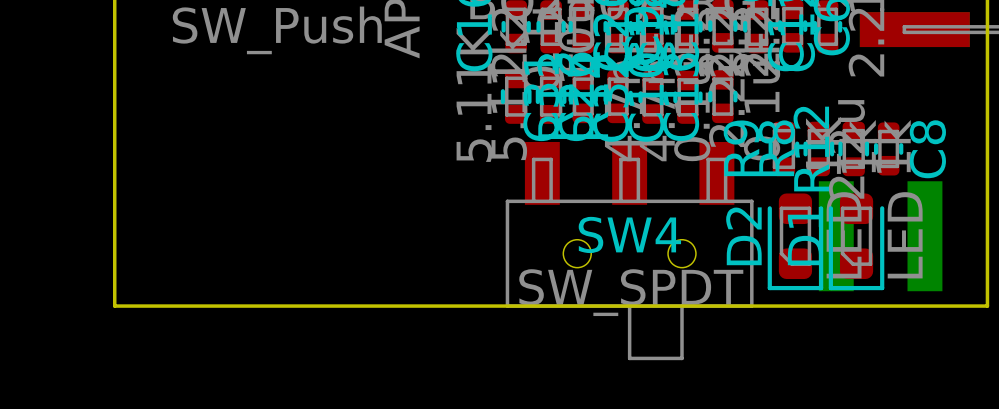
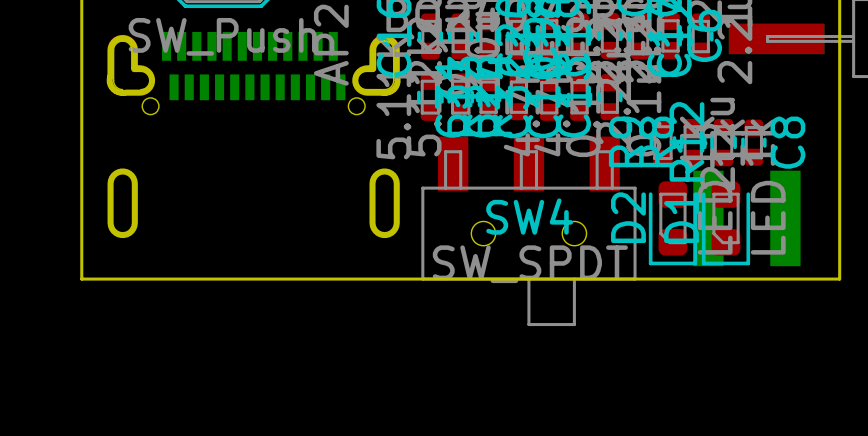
part: none -> (253, 135)

